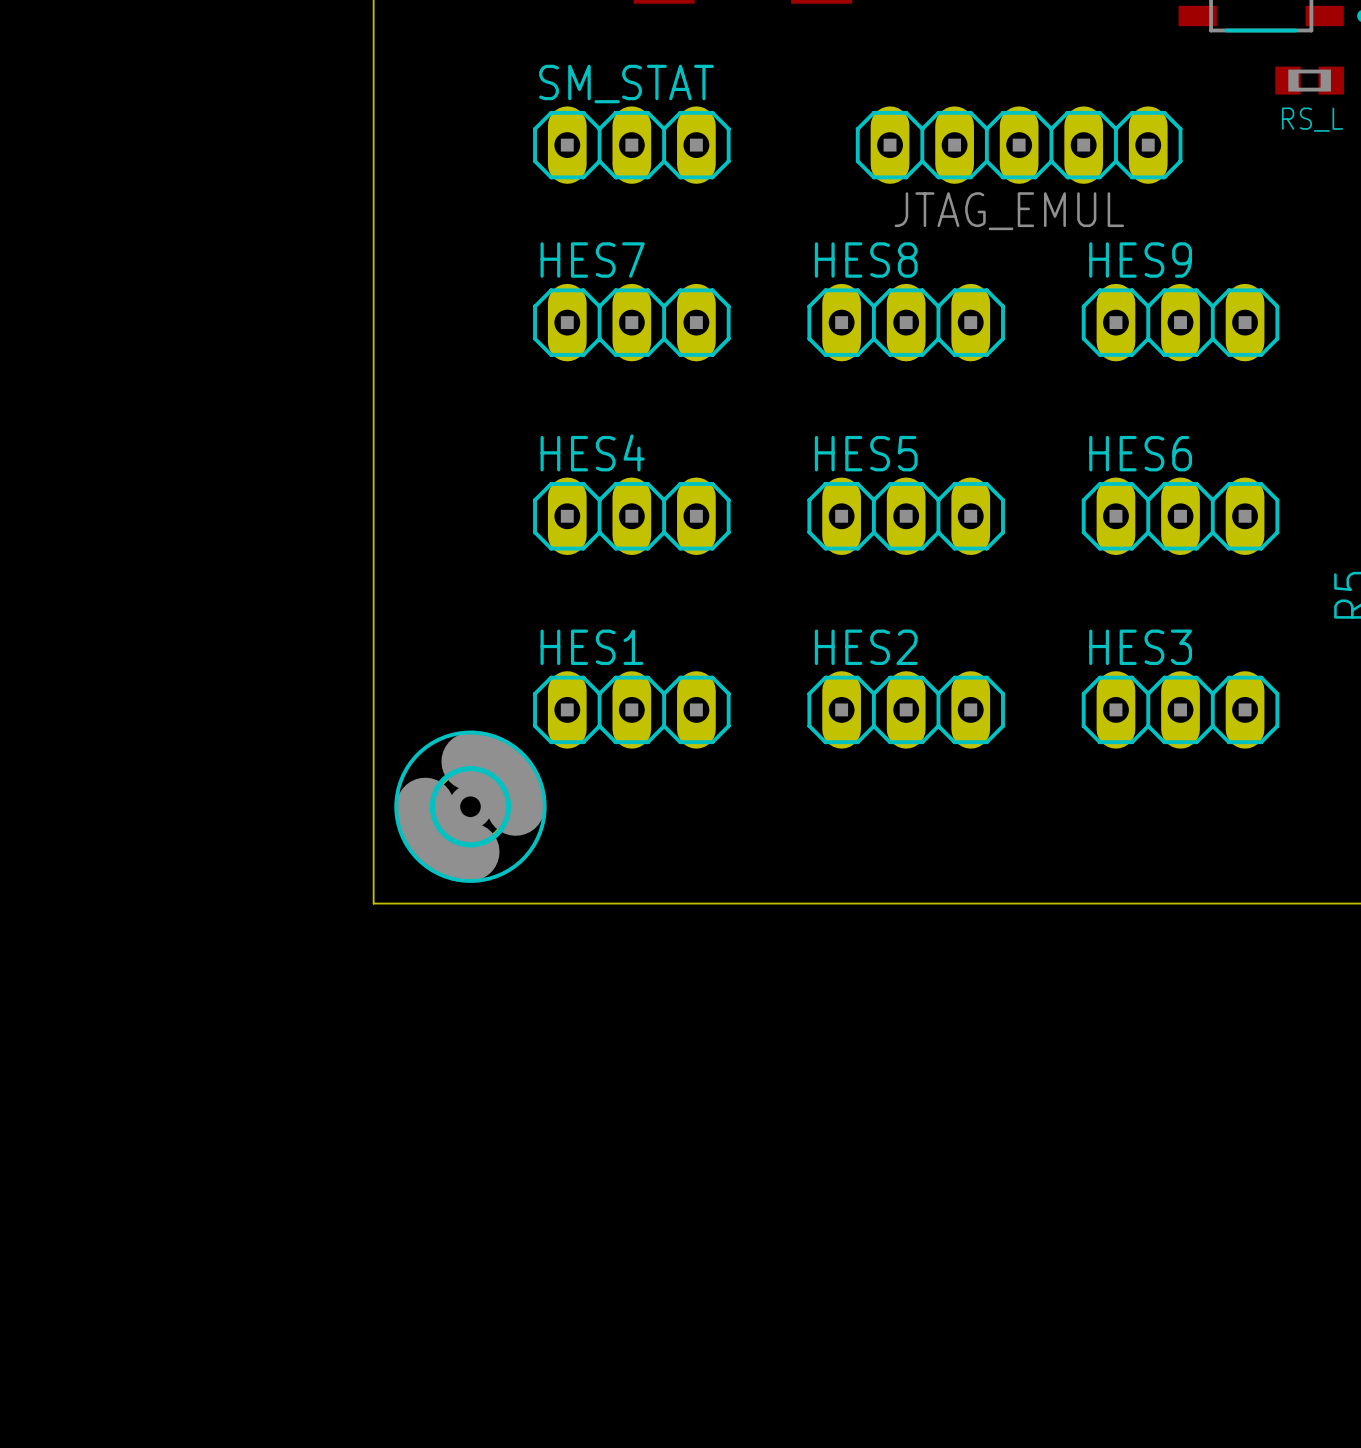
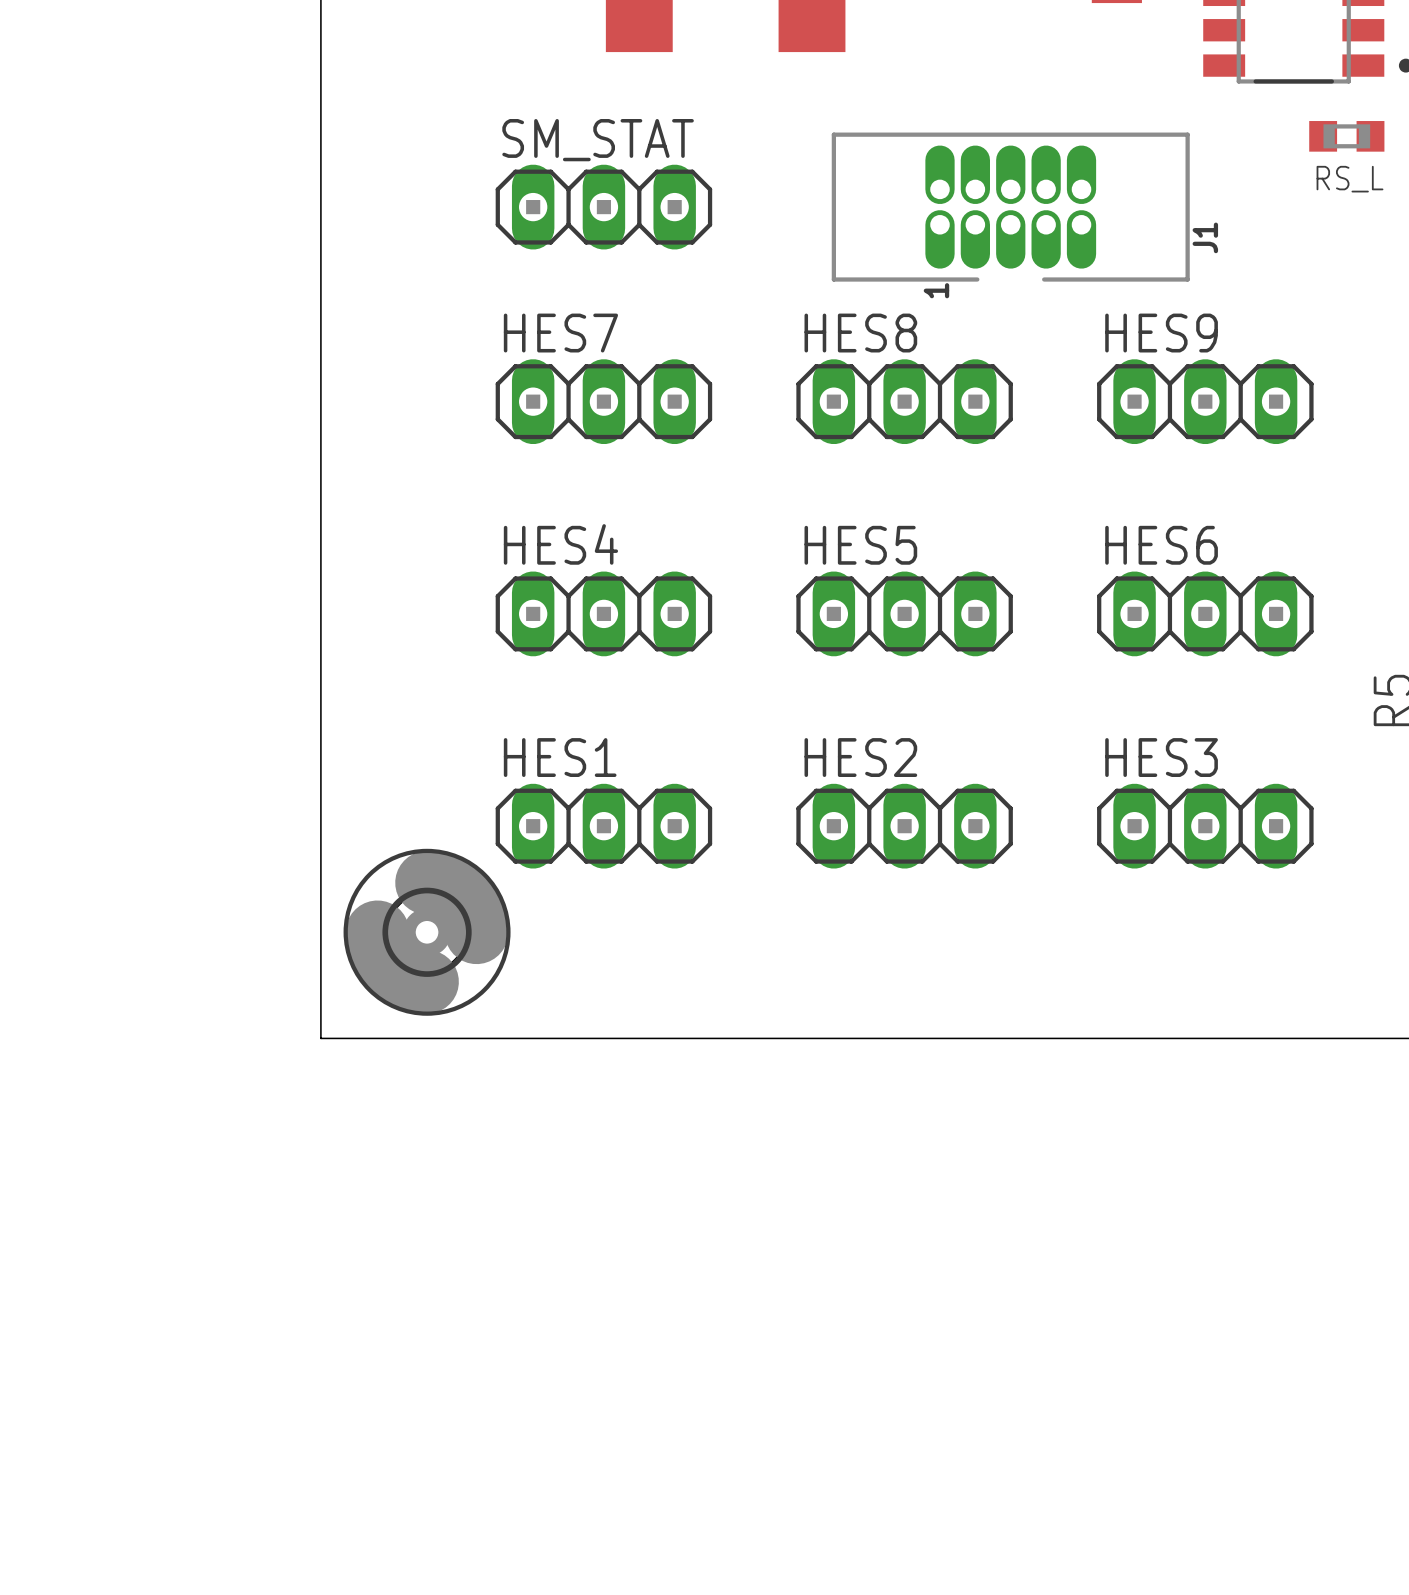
J1: none -> (1010, 207)
part: JTAG_EMUL (1019, 145) -> none

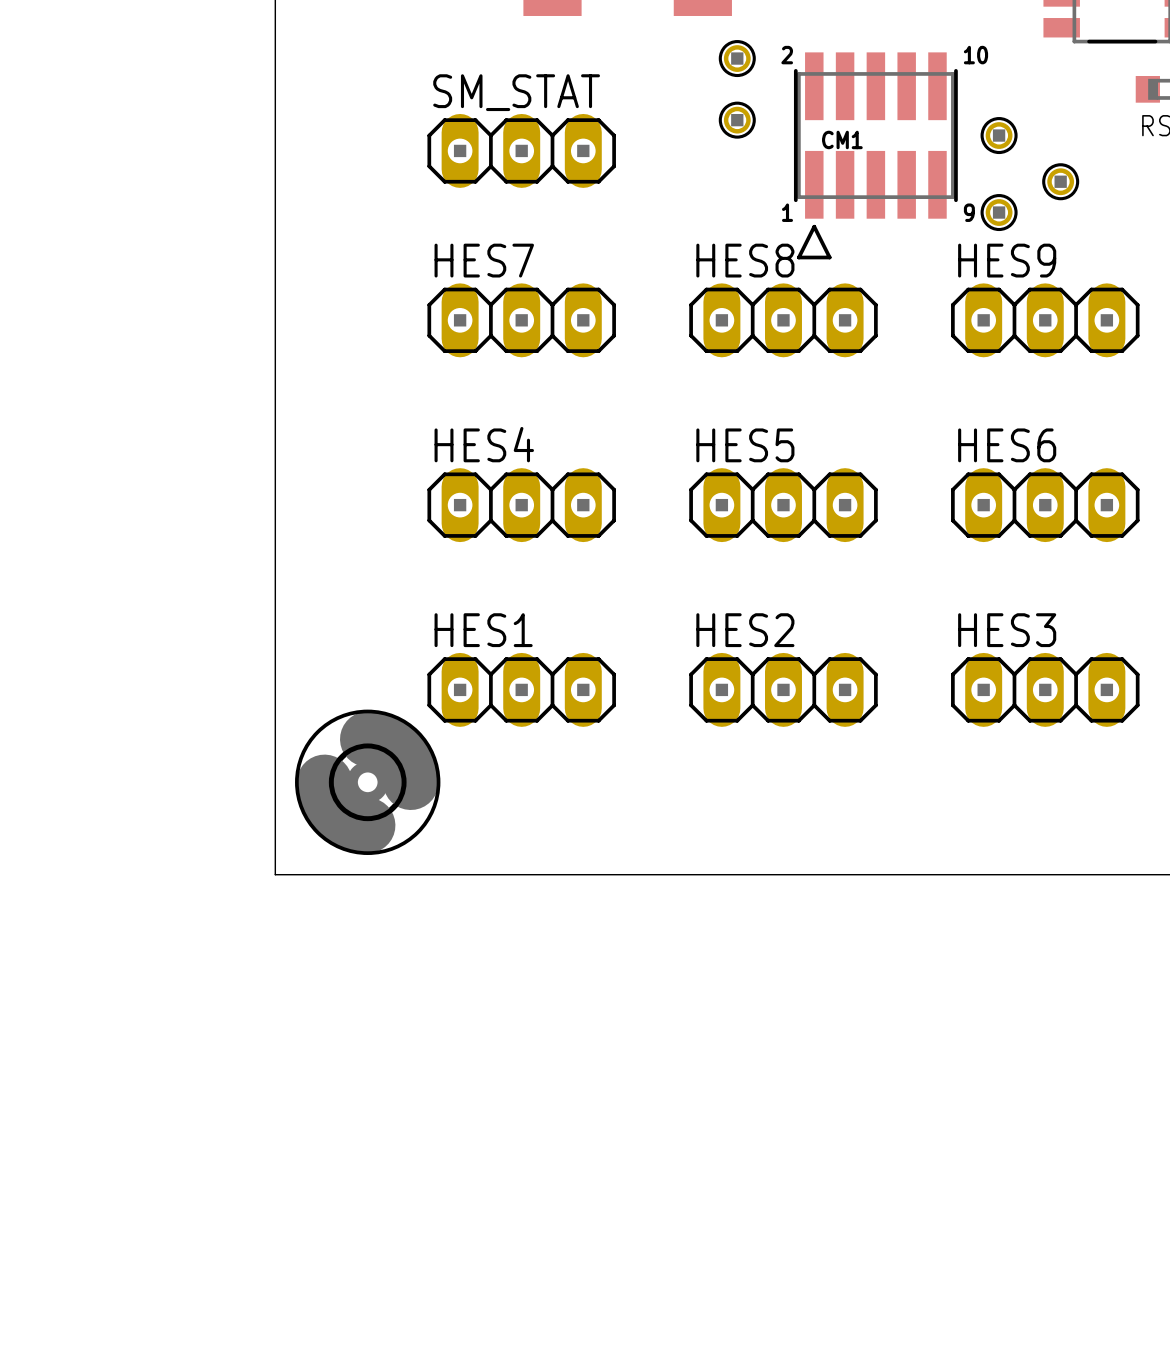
part: none -> (737, 58)
part: none -> (737, 120)
part: none -> (999, 135)
J1: (1010, 207) -> none
CM1: none -> (875, 155)
part: none -> (1060, 181)
part: none -> (999, 212)

